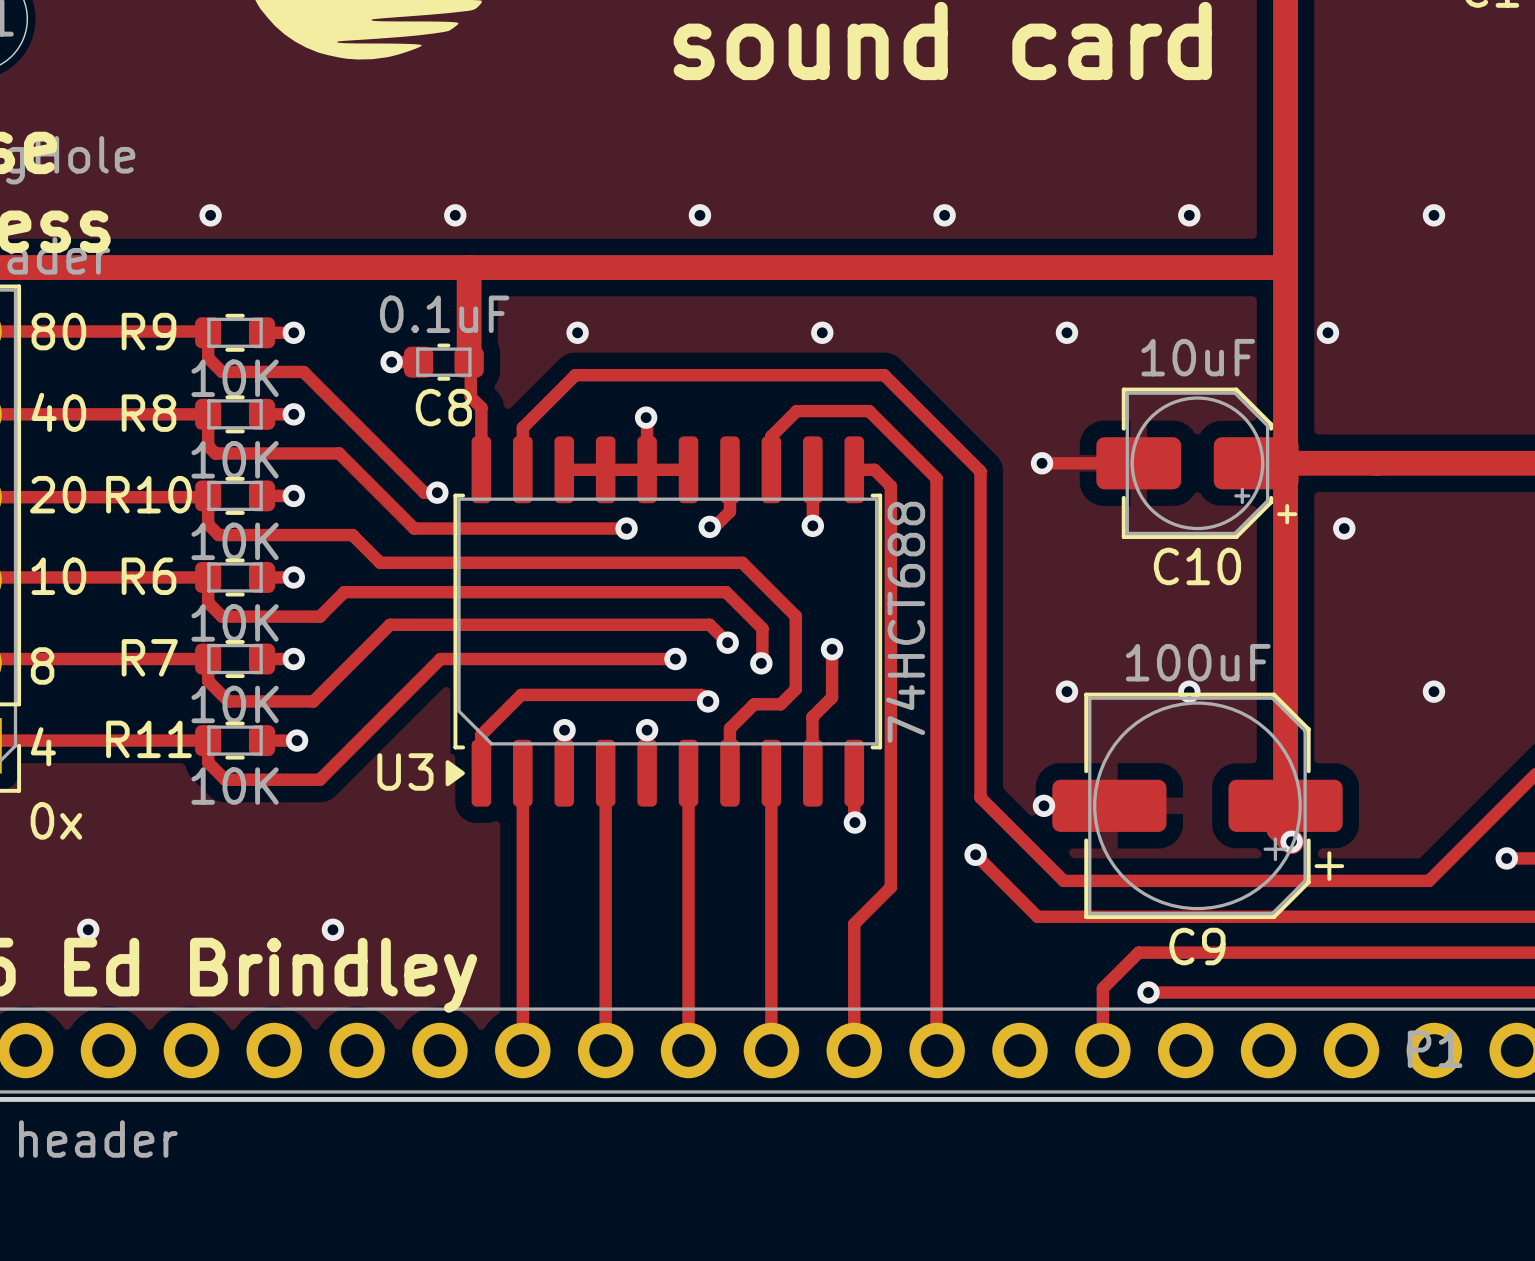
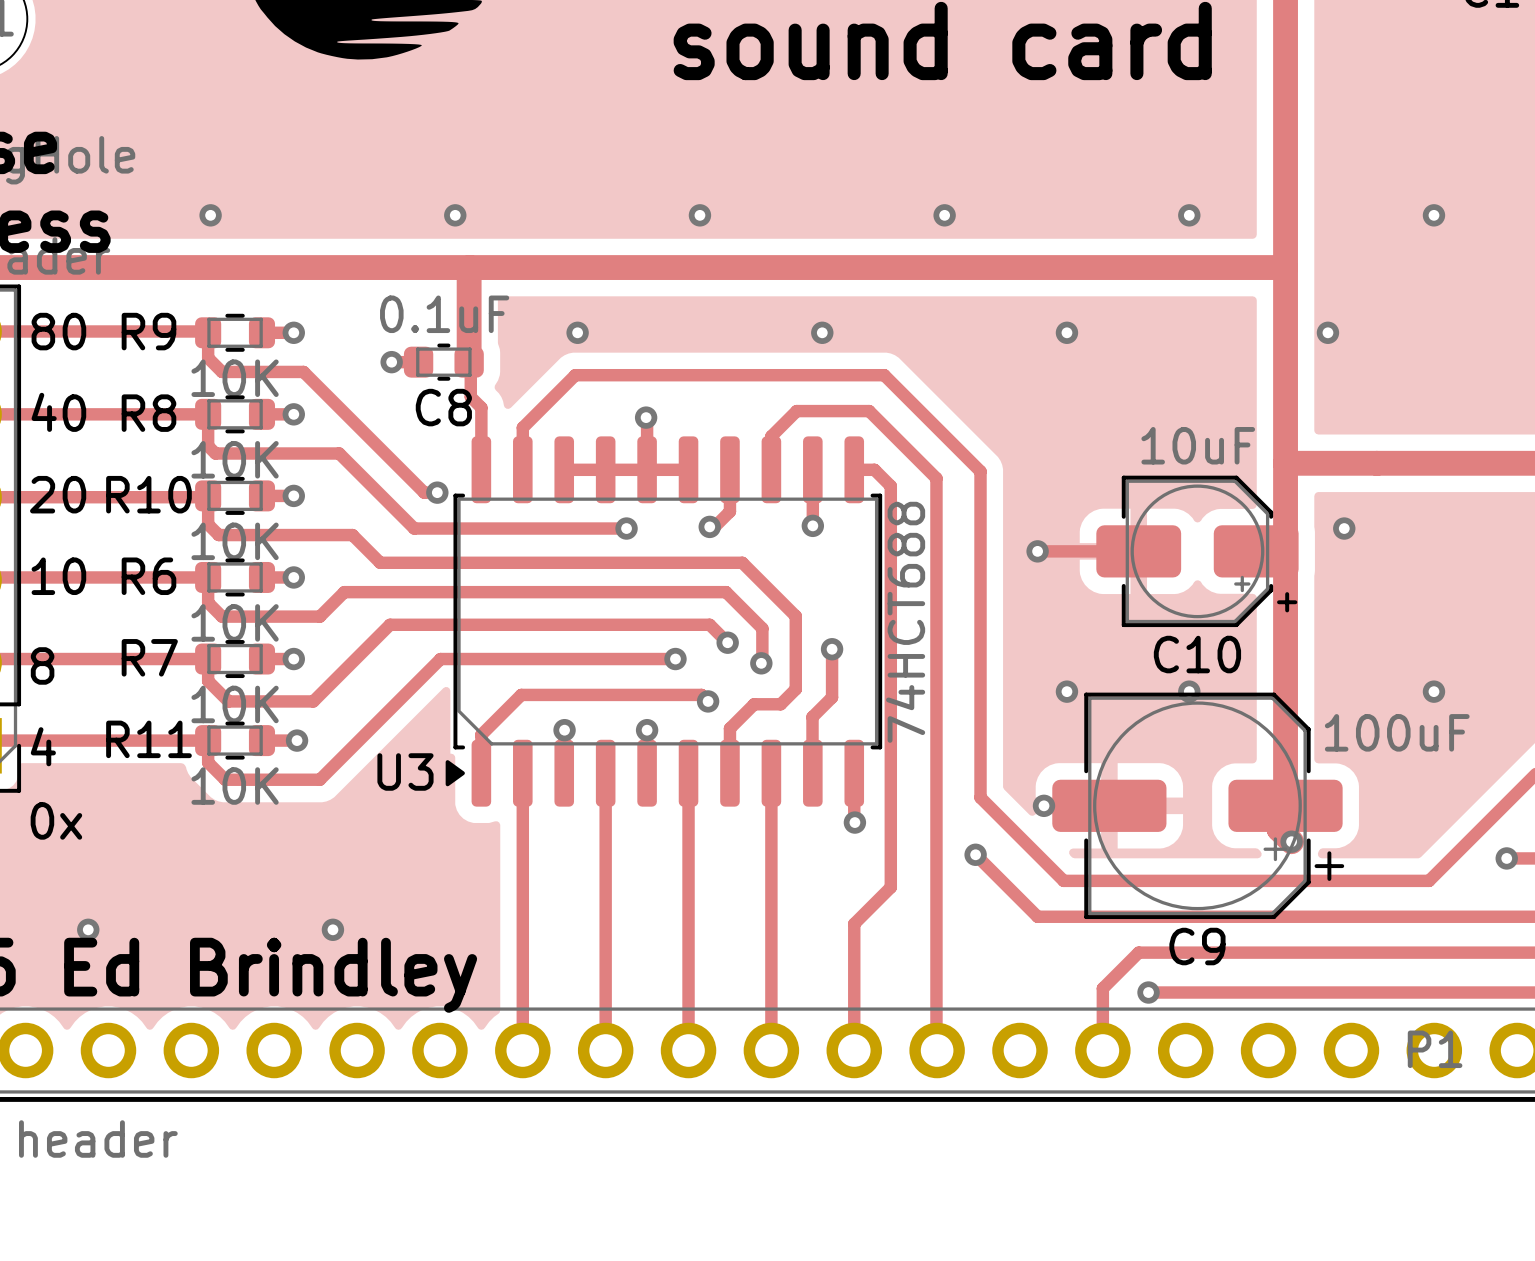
track: (1042, 463) (1109, 463) -> none
via position: (1042, 463) -> (1037, 551)
C10 position: (1197, 463) -> (1197, 551)
track: none -> (1037, 551) (1138, 551)
C9 value position: 100uF (1198, 662) -> 100uF (1397, 732)

